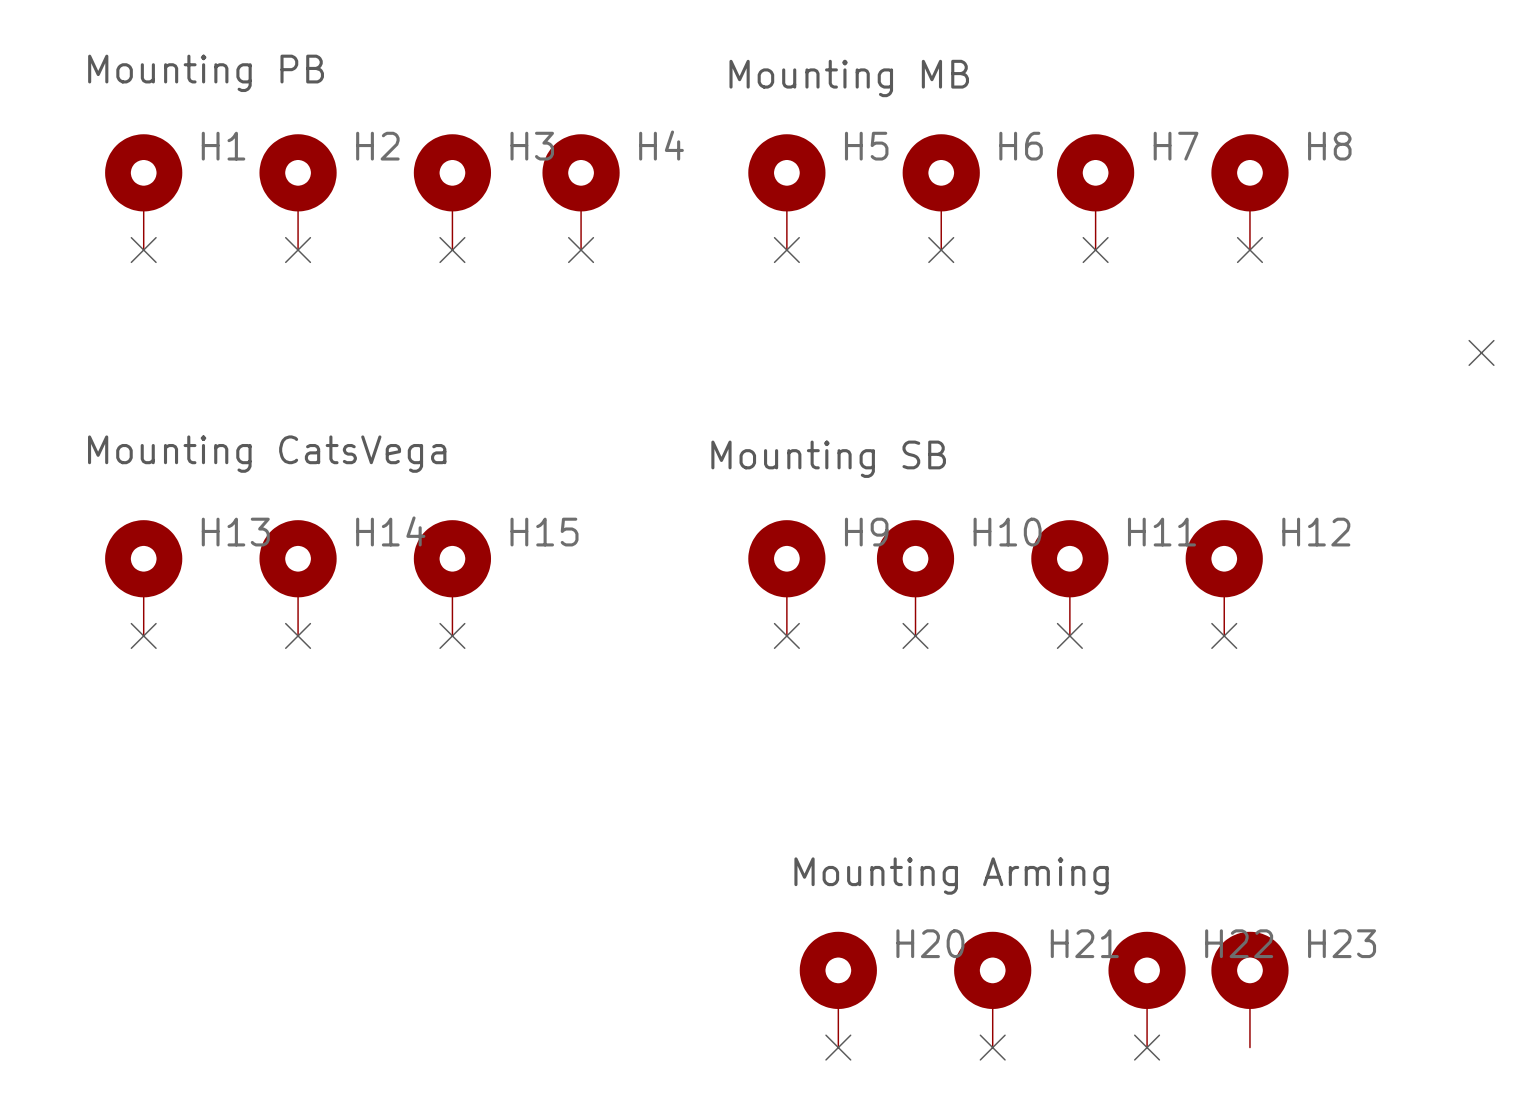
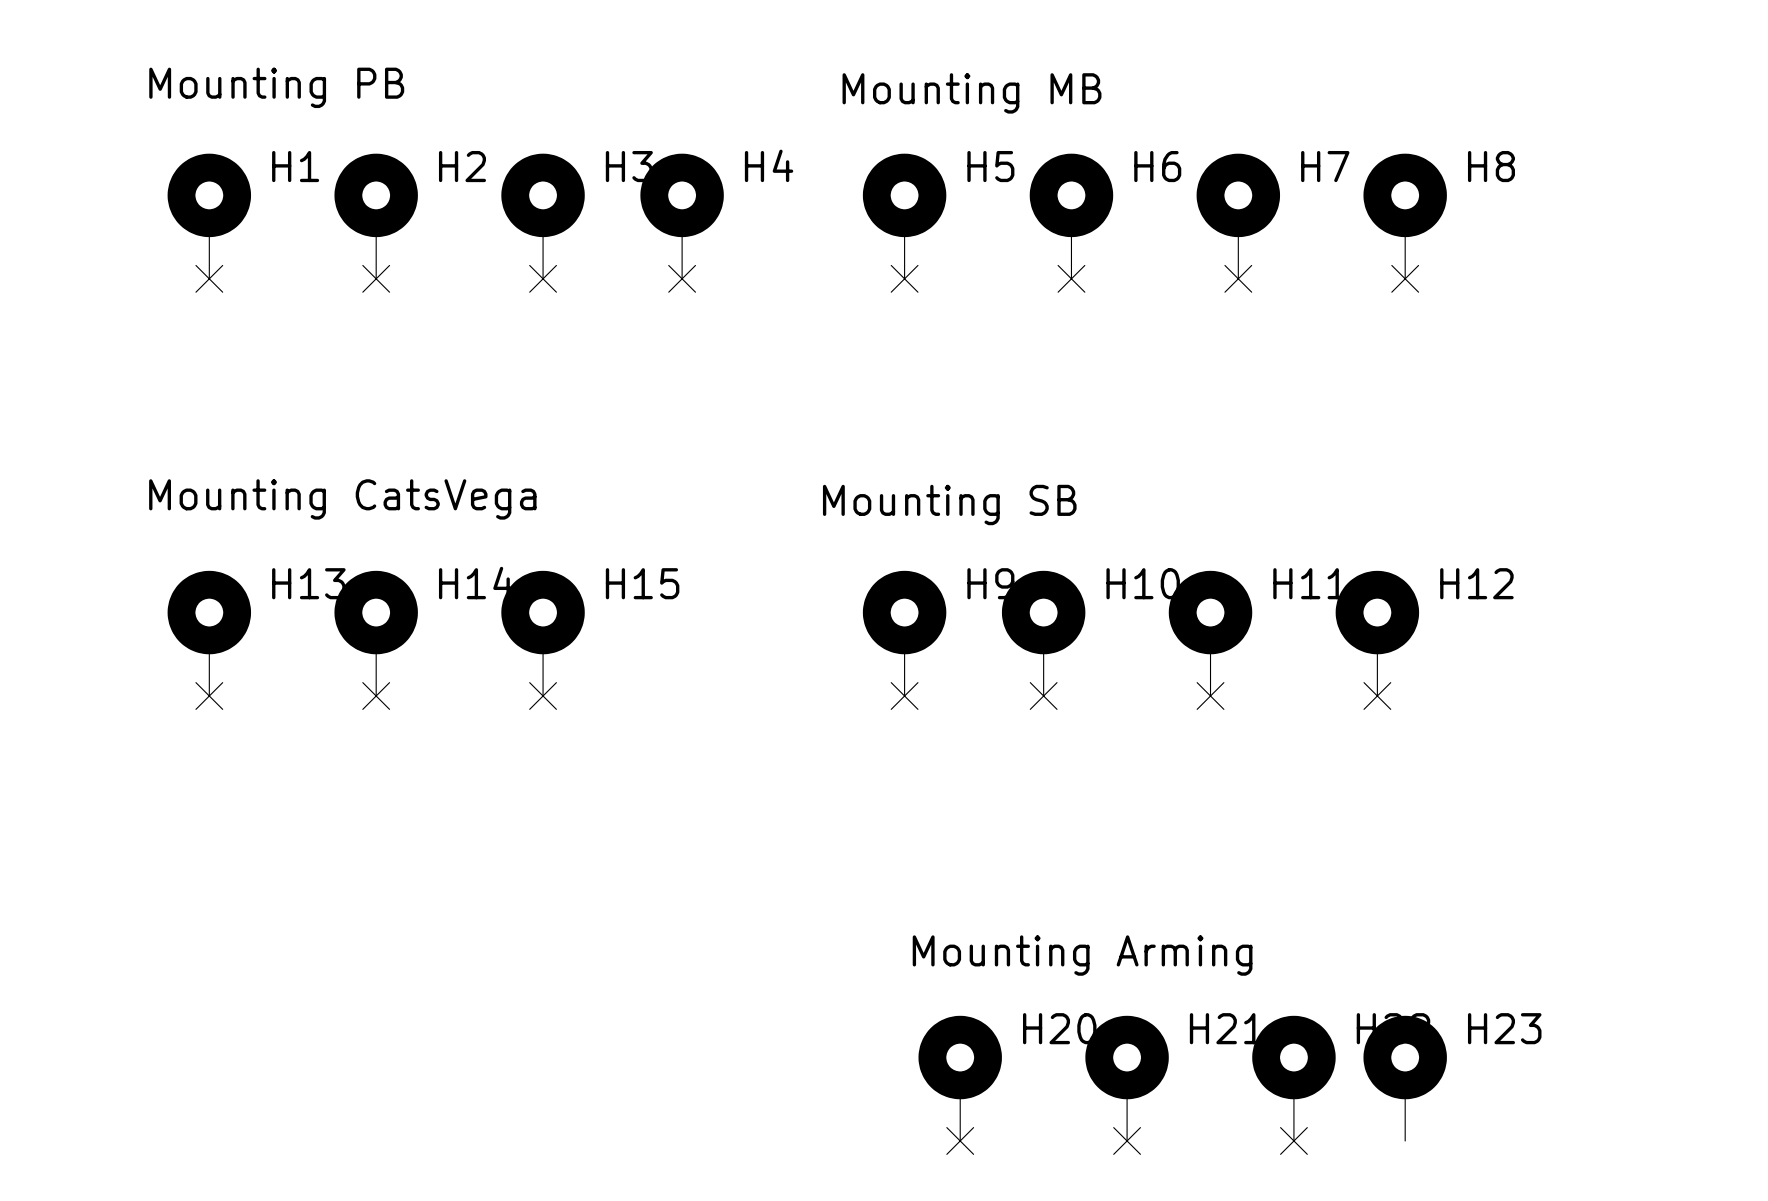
no-connect mark: (1481, 352) -> none

